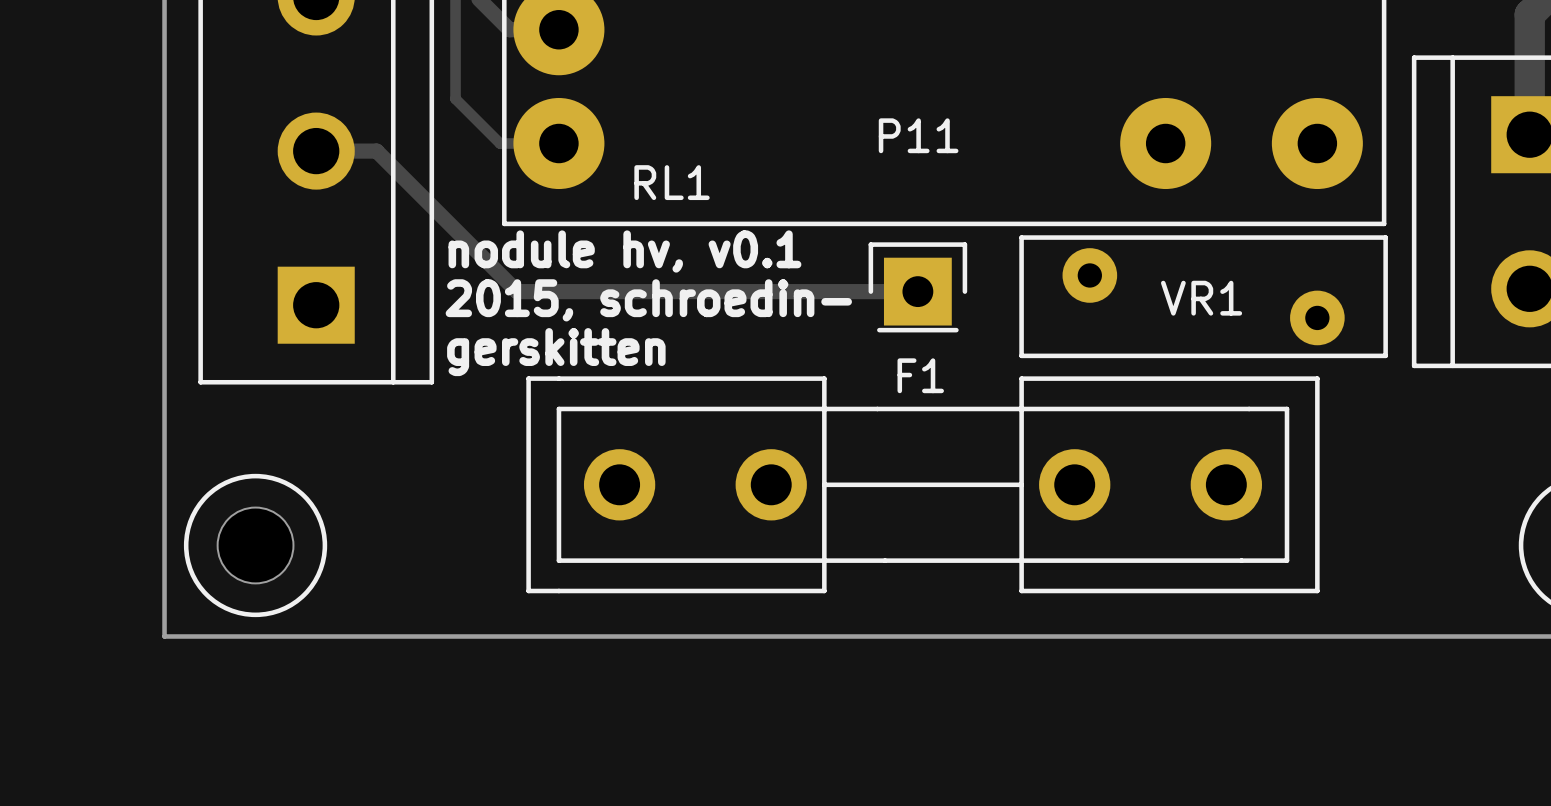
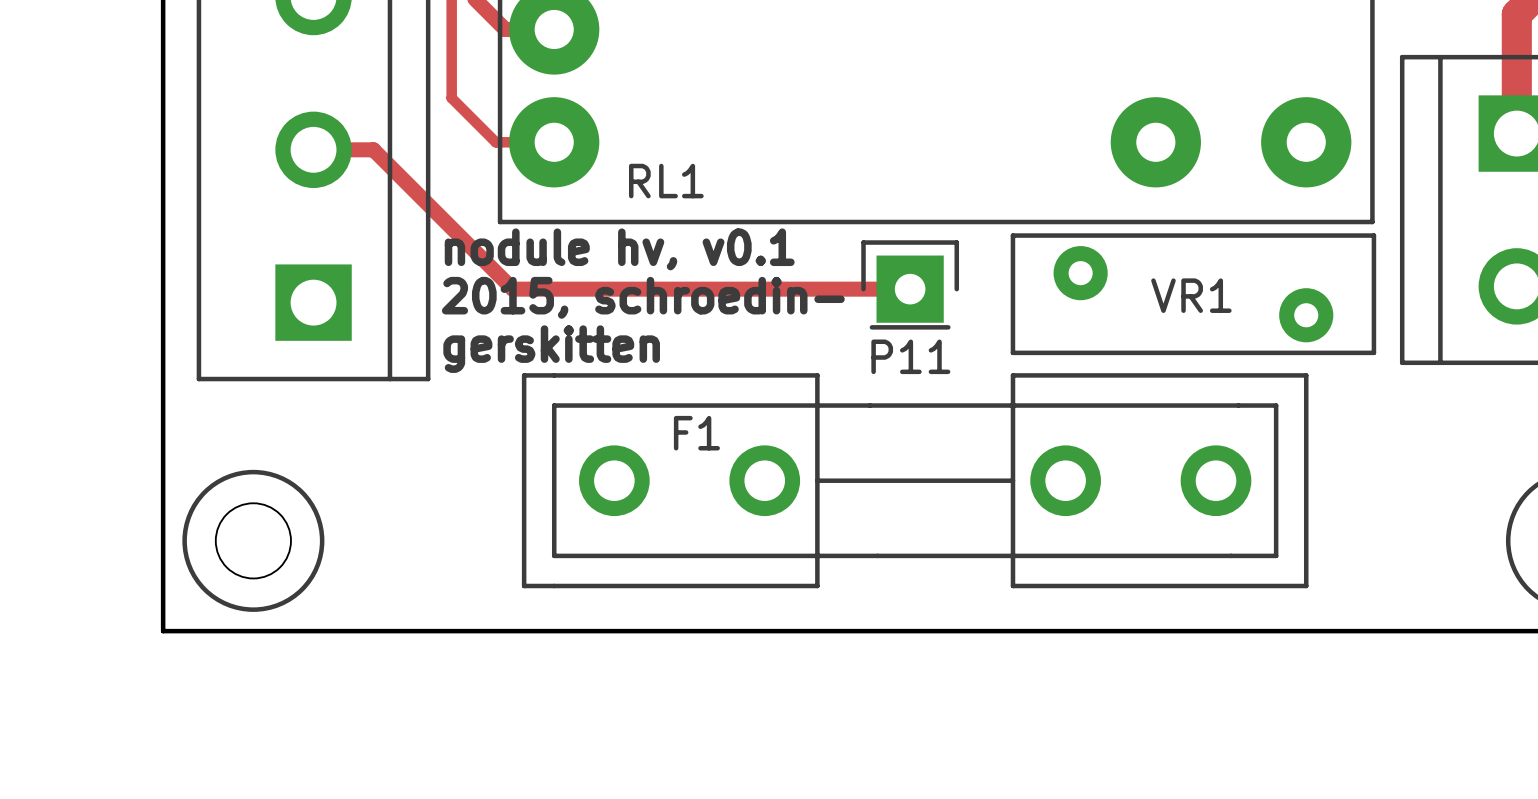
P11 name position: P11 (918, 135) -> P11 (910, 356)
F1 name position: F1 (920, 375) -> F1 (696, 433)

